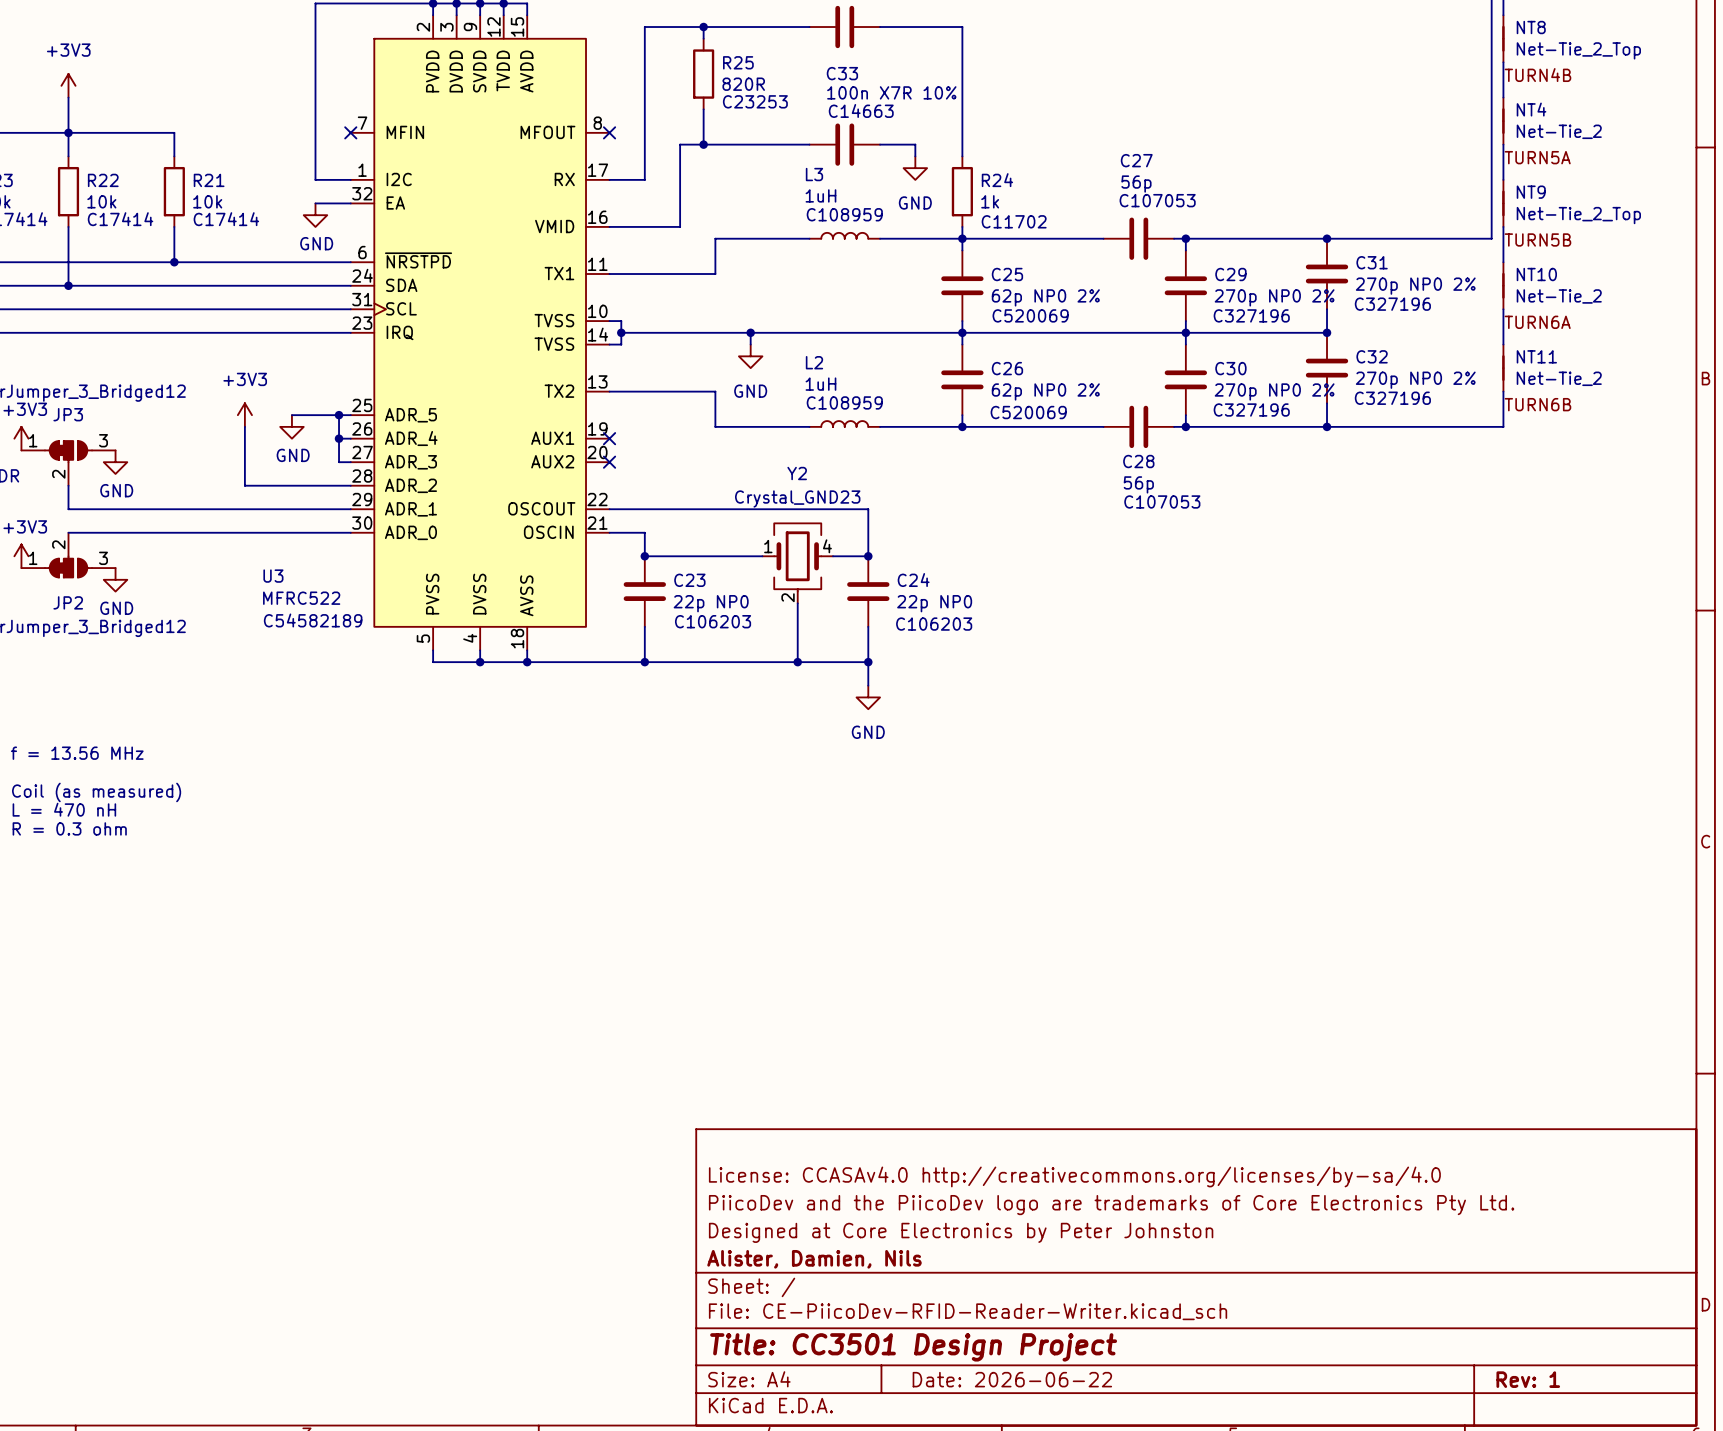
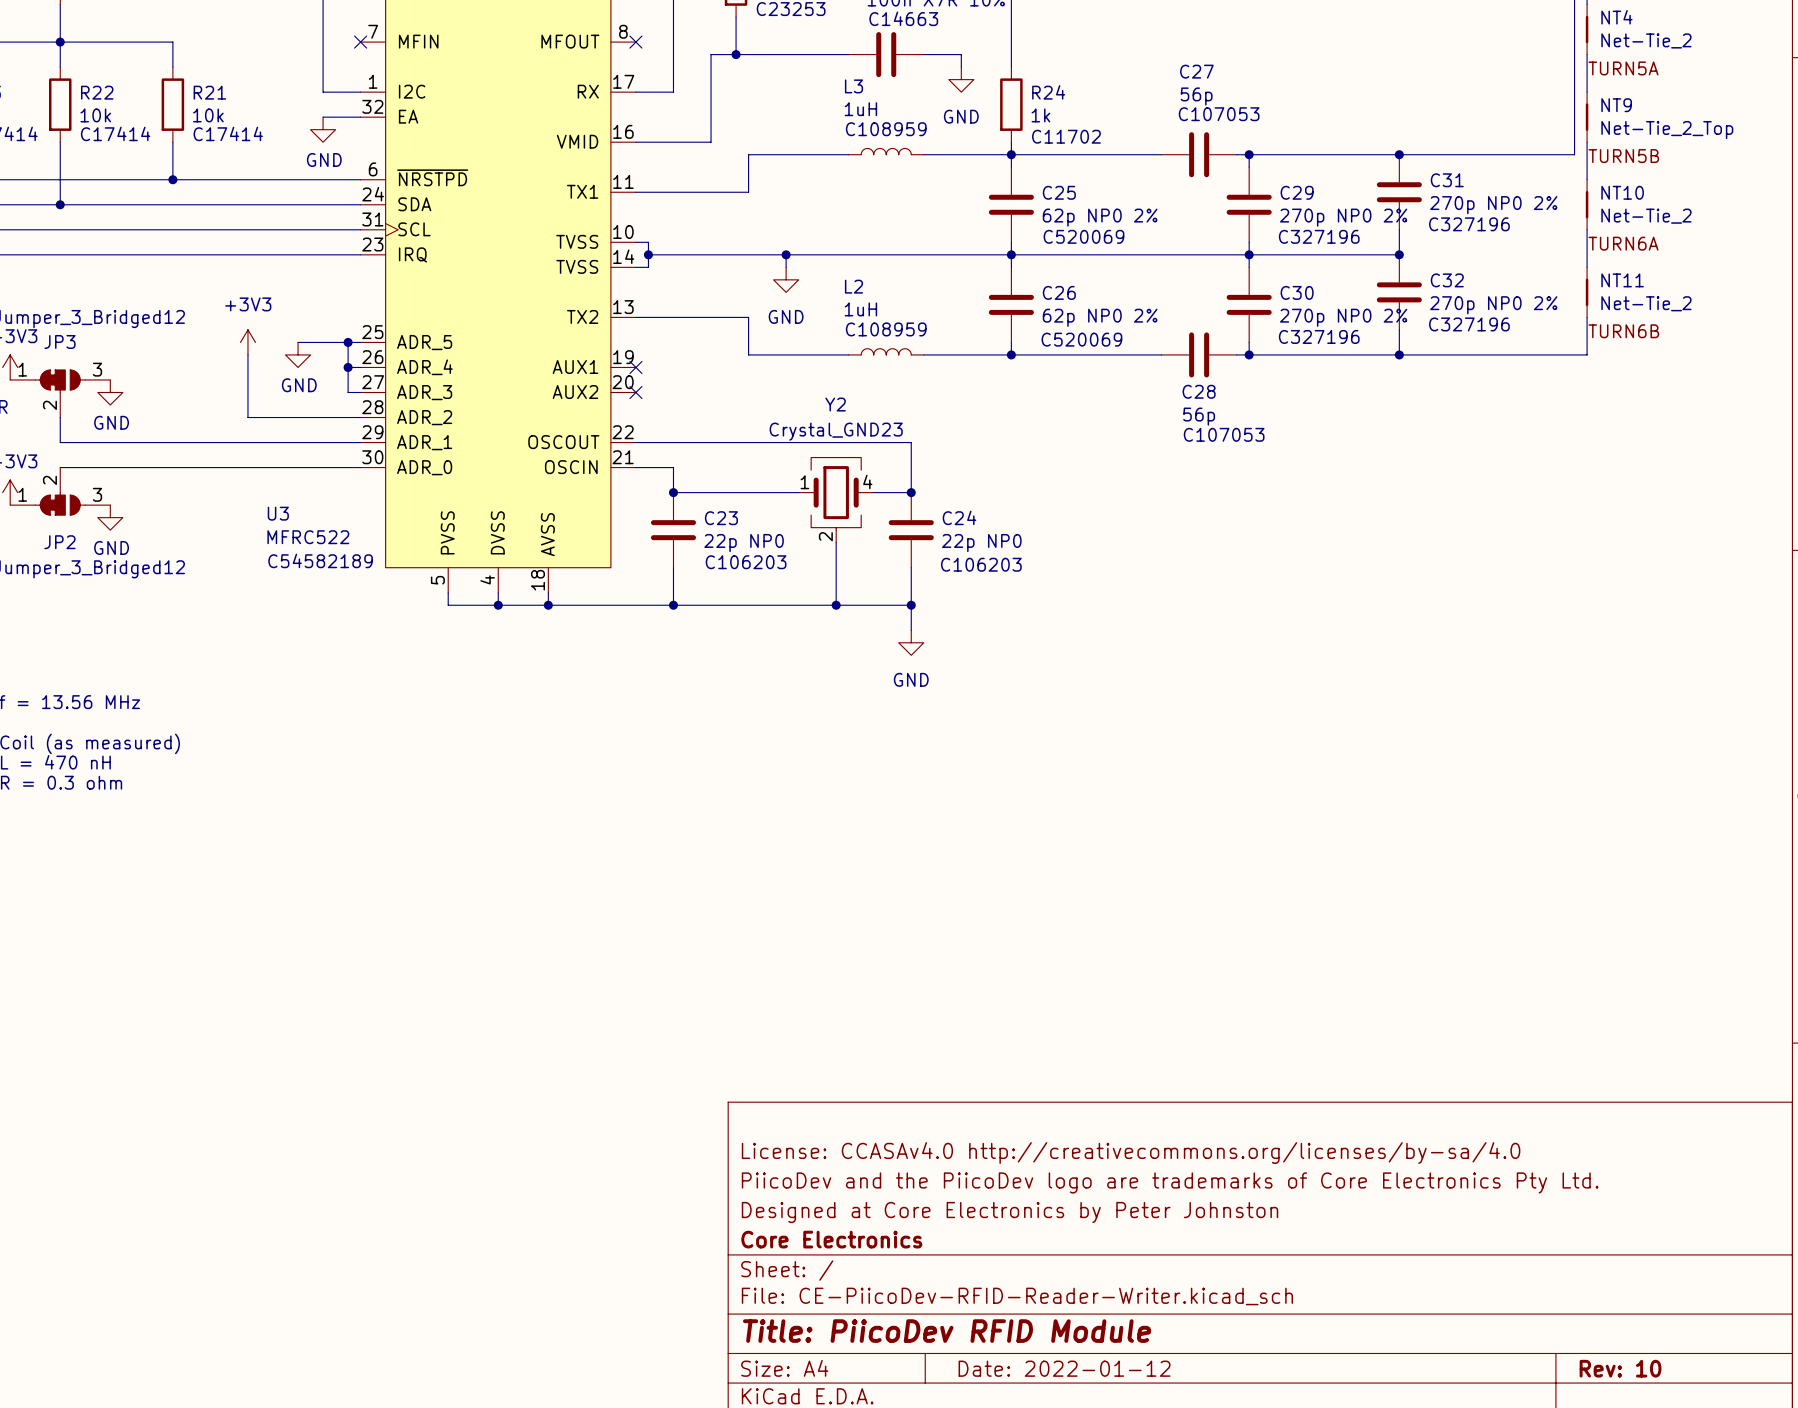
title block: Alister, Damien, Nils (814, 1259) -> Core Electronics (831, 1239)
title block: Title: CC3501 Design Project (913, 1347) -> Title: PiicoDev RFID Module (947, 1331)
title block: Date: 2026-06-22 (1012, 1379) -> Date: 2022-01-12 (1064, 1368)
title block: Rev: 1 (1528, 1379) -> Rev: 10 (1620, 1368)

